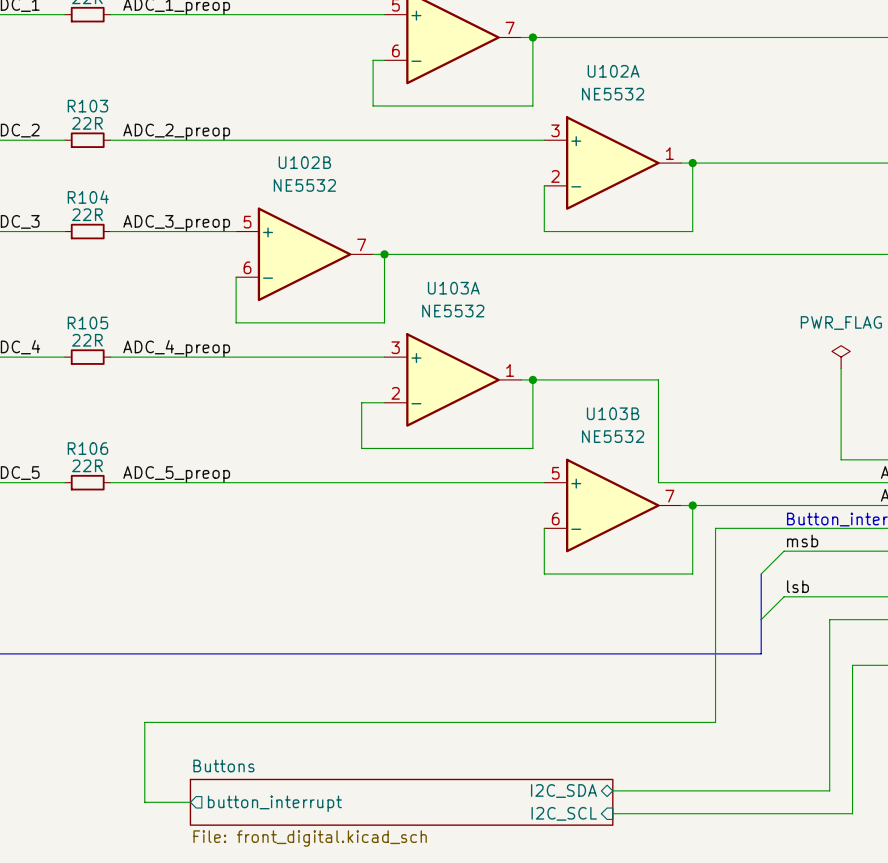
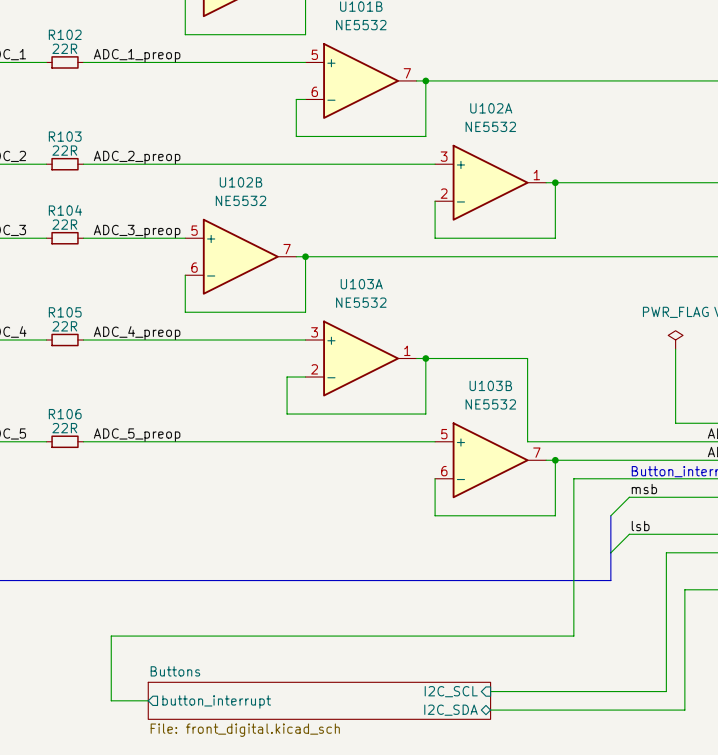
sheet pin shape: bidirectional (563, 791) -> input (451, 691)
sheet pin: I2C_SDA (563, 791) -> I2C_SCL (451, 691)
sheet pin shape: input (564, 813) -> bidirectional (451, 710)
sheet pin: I2C_SCL (564, 813) -> I2C_SDA (451, 710)

